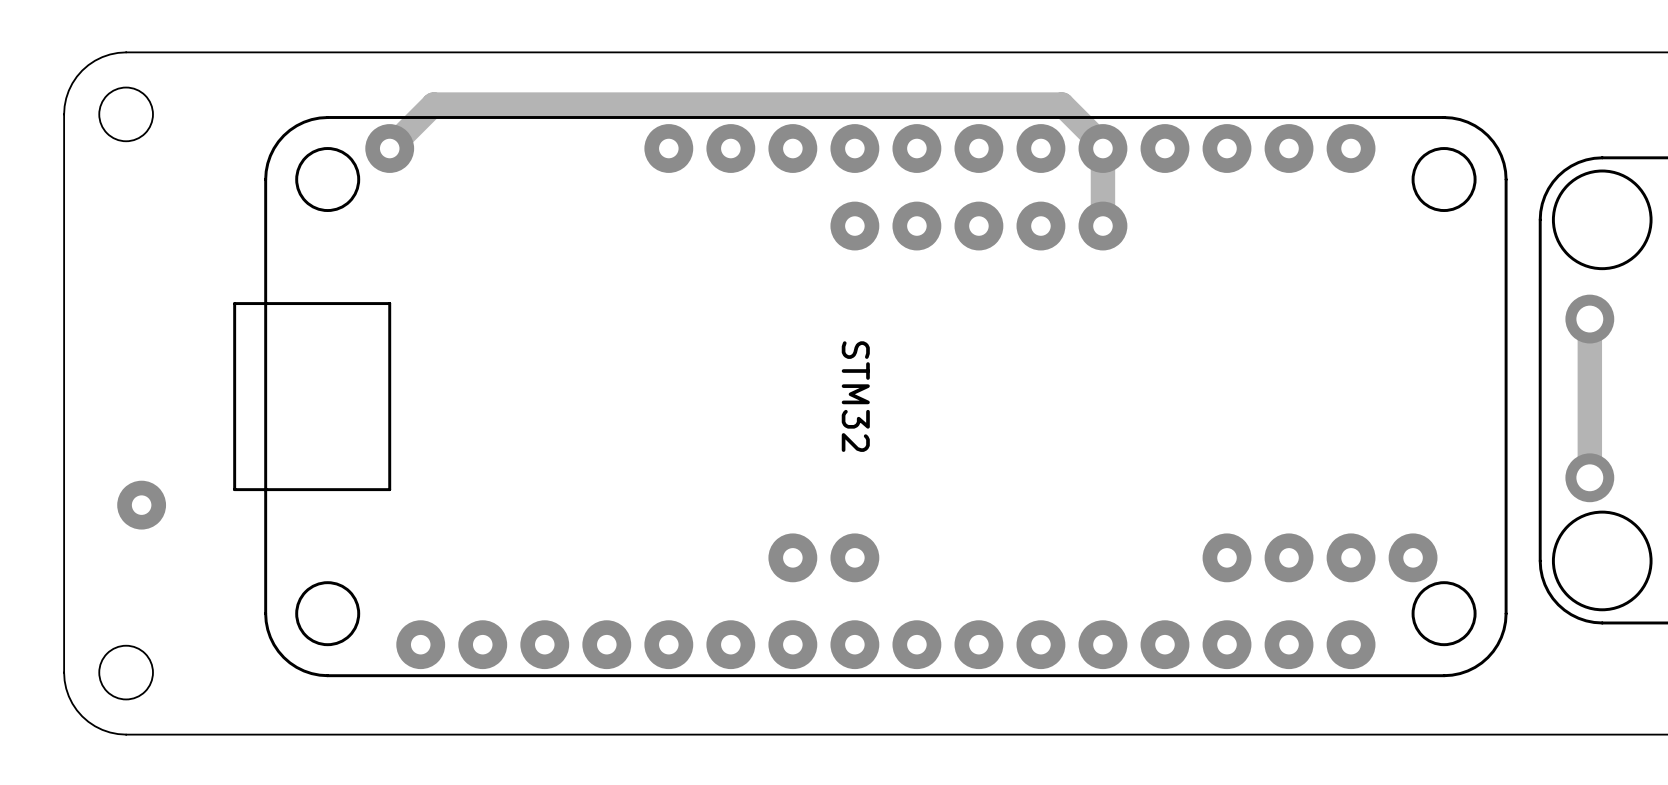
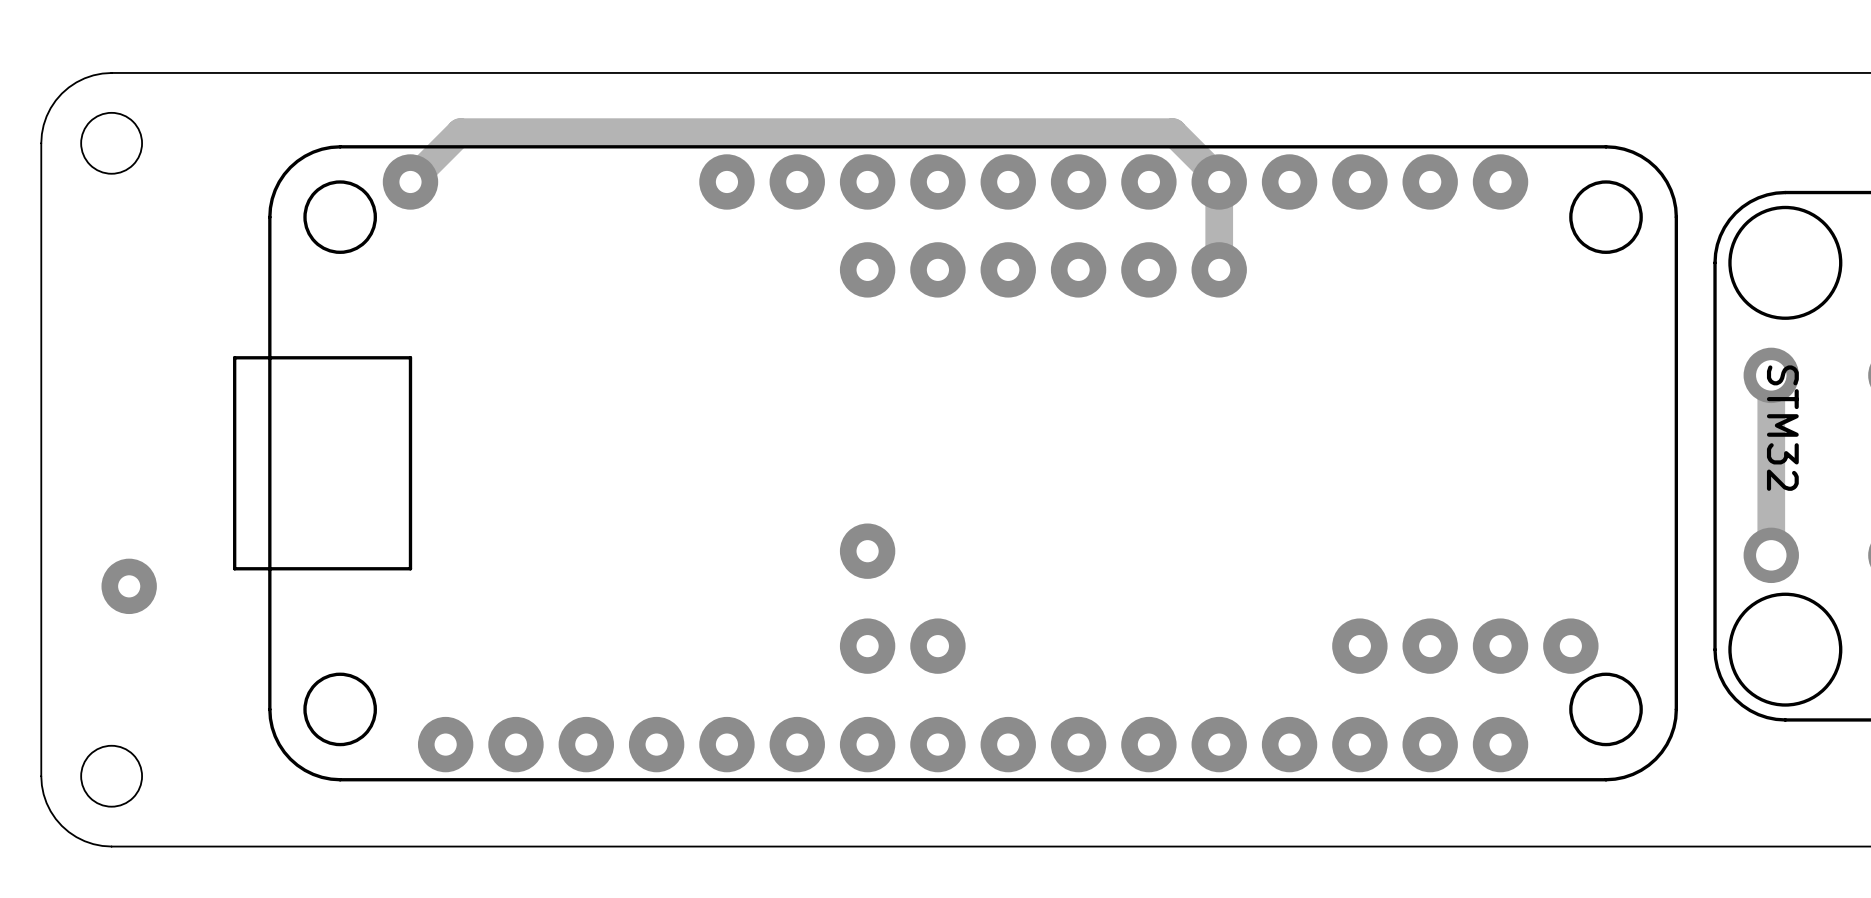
part: none -> (867, 269)
STM32 name position: STM32 (855, 396) -> STM32 (1782, 428)
part: none -> (867, 551)

